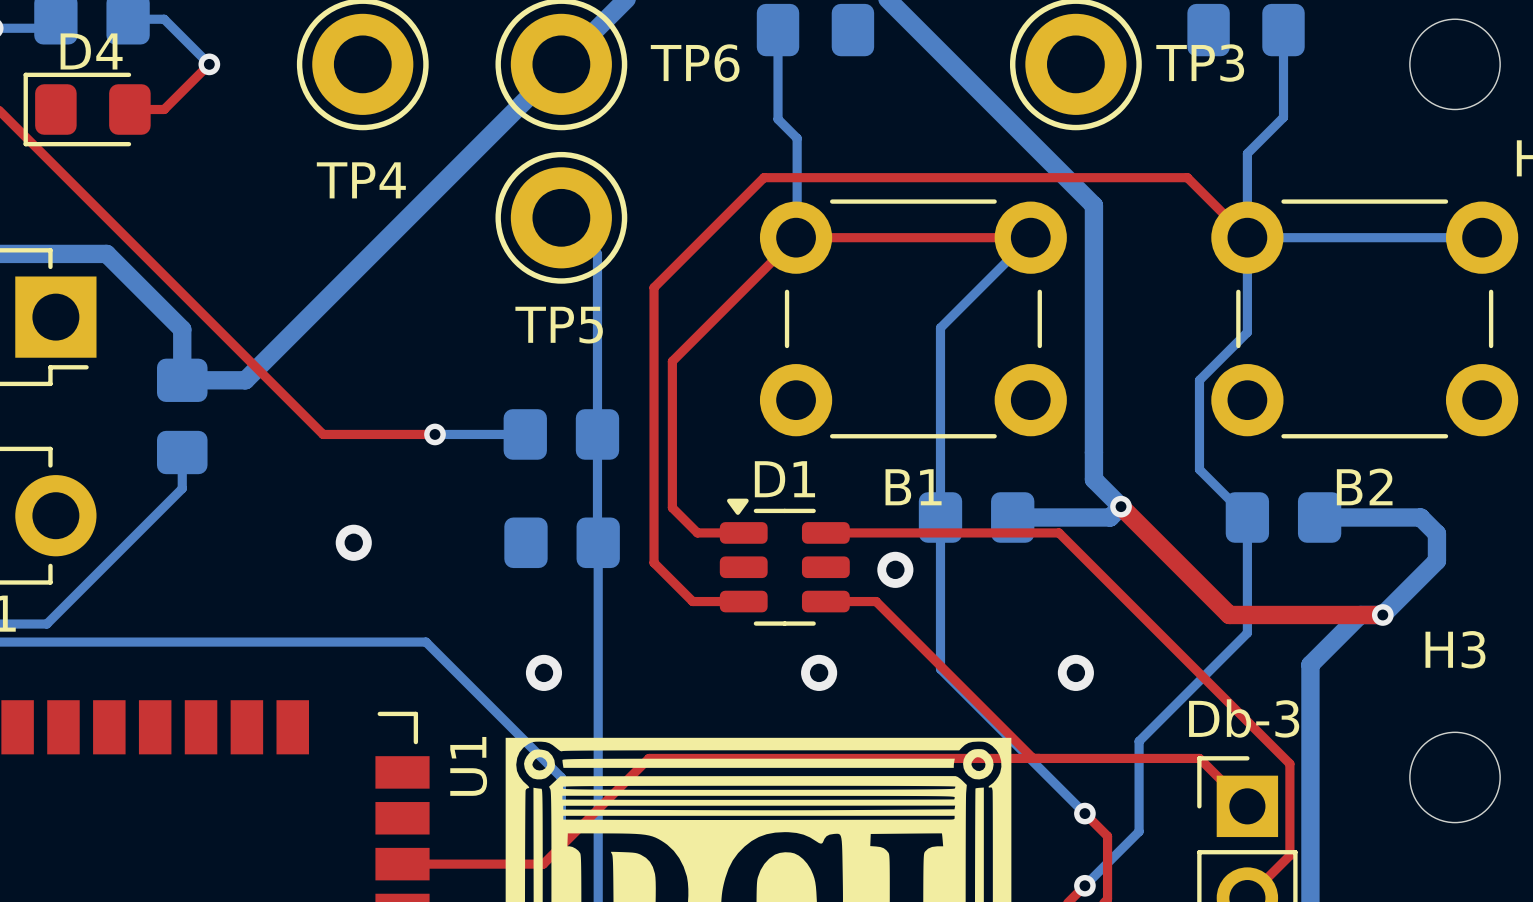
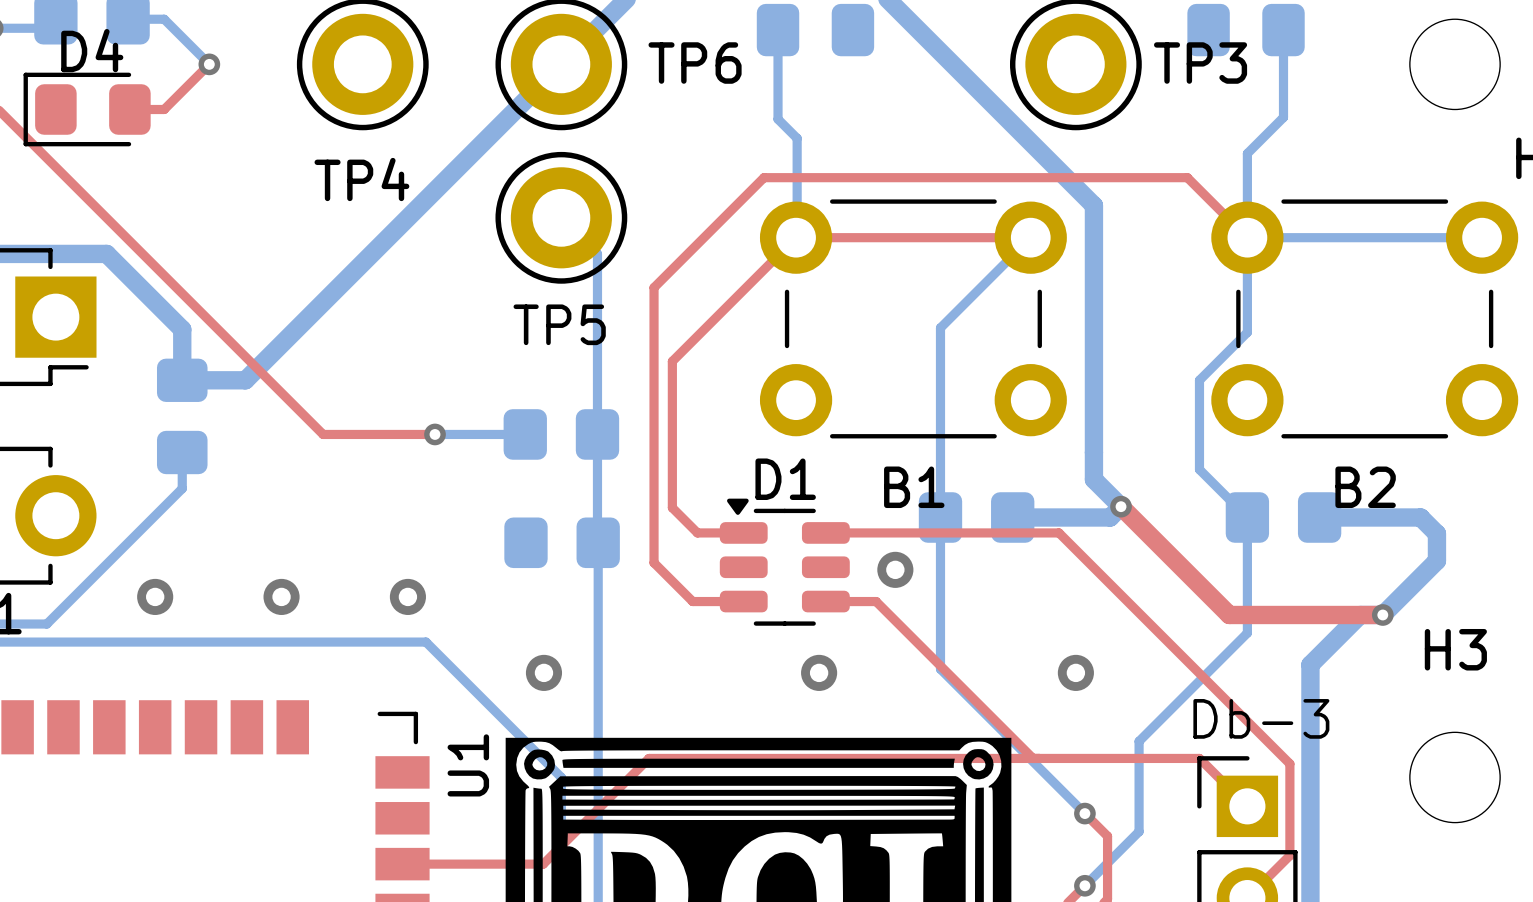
via: (353, 542) -> none
via: none -> (155, 596)
via: none -> (281, 596)
via: none -> (407, 596)

